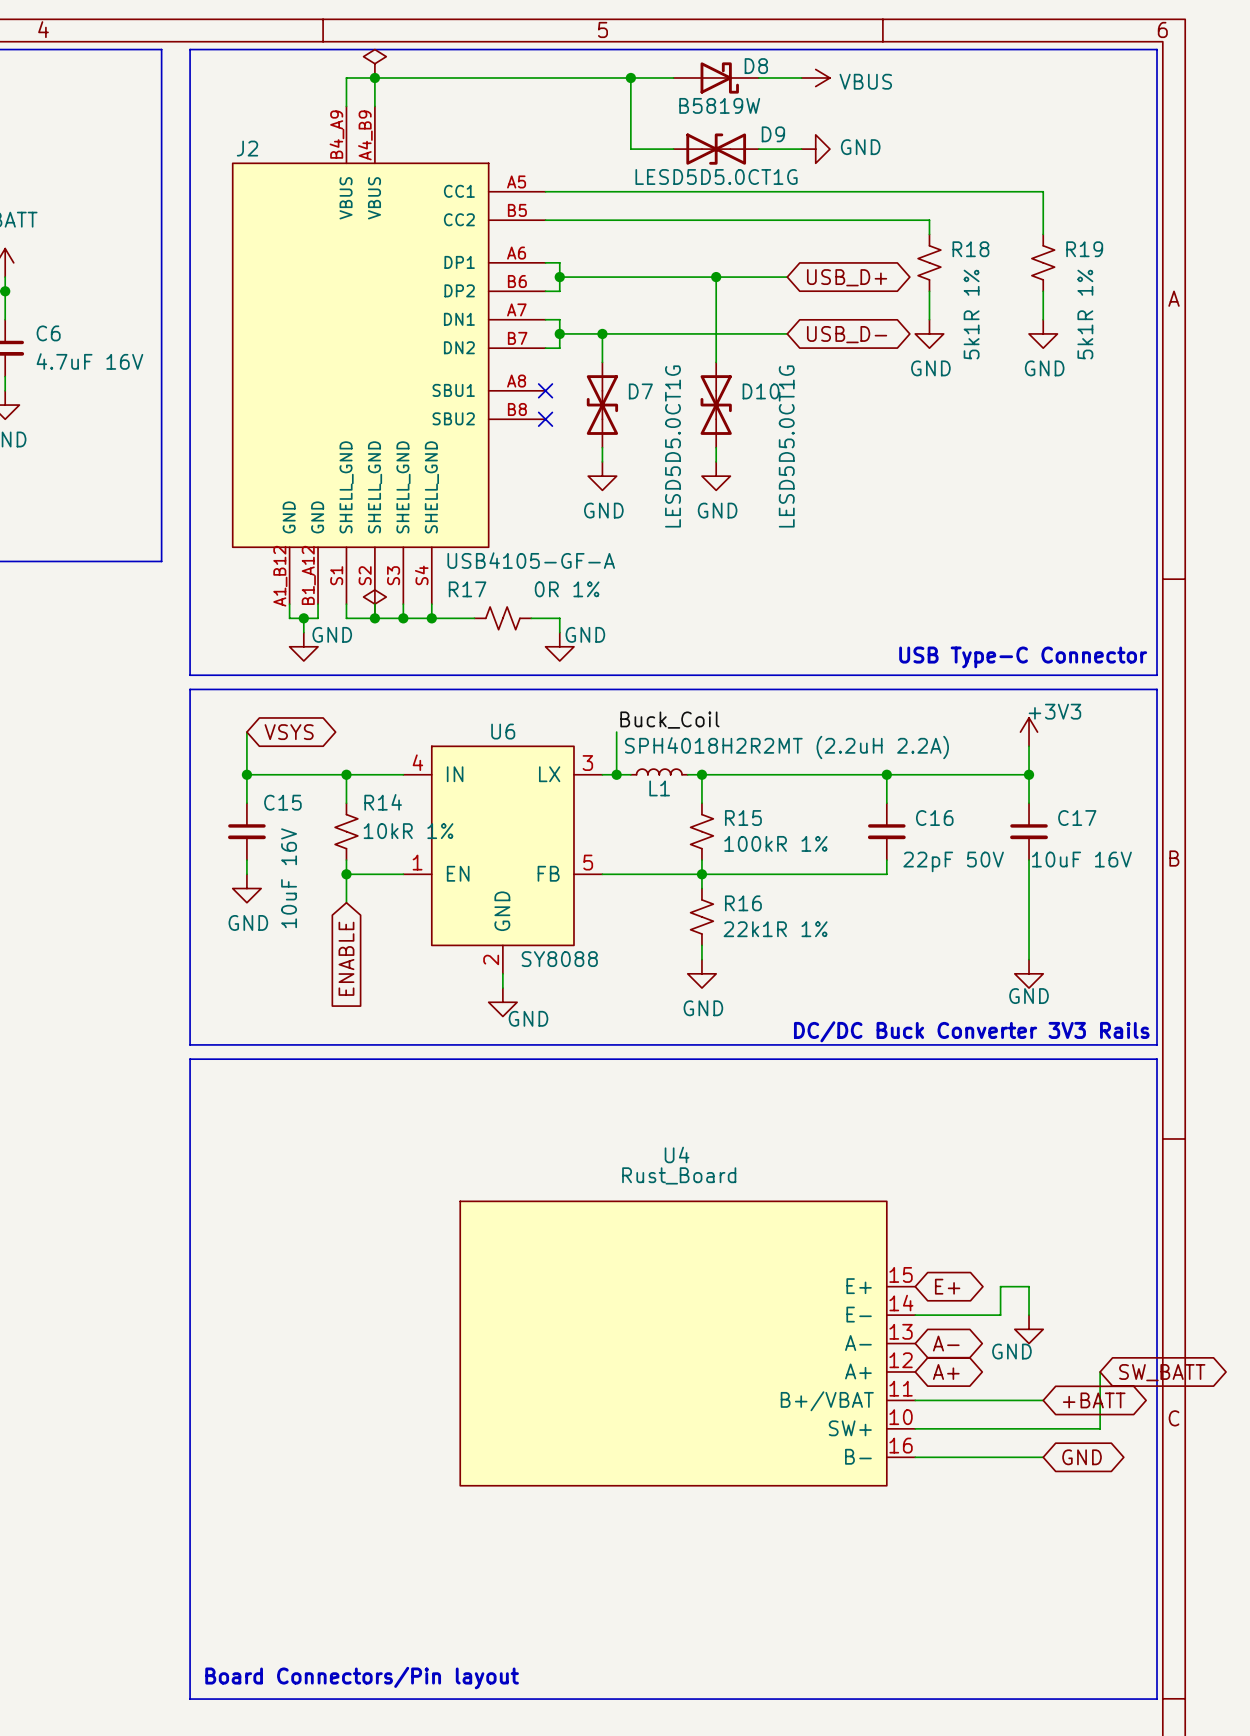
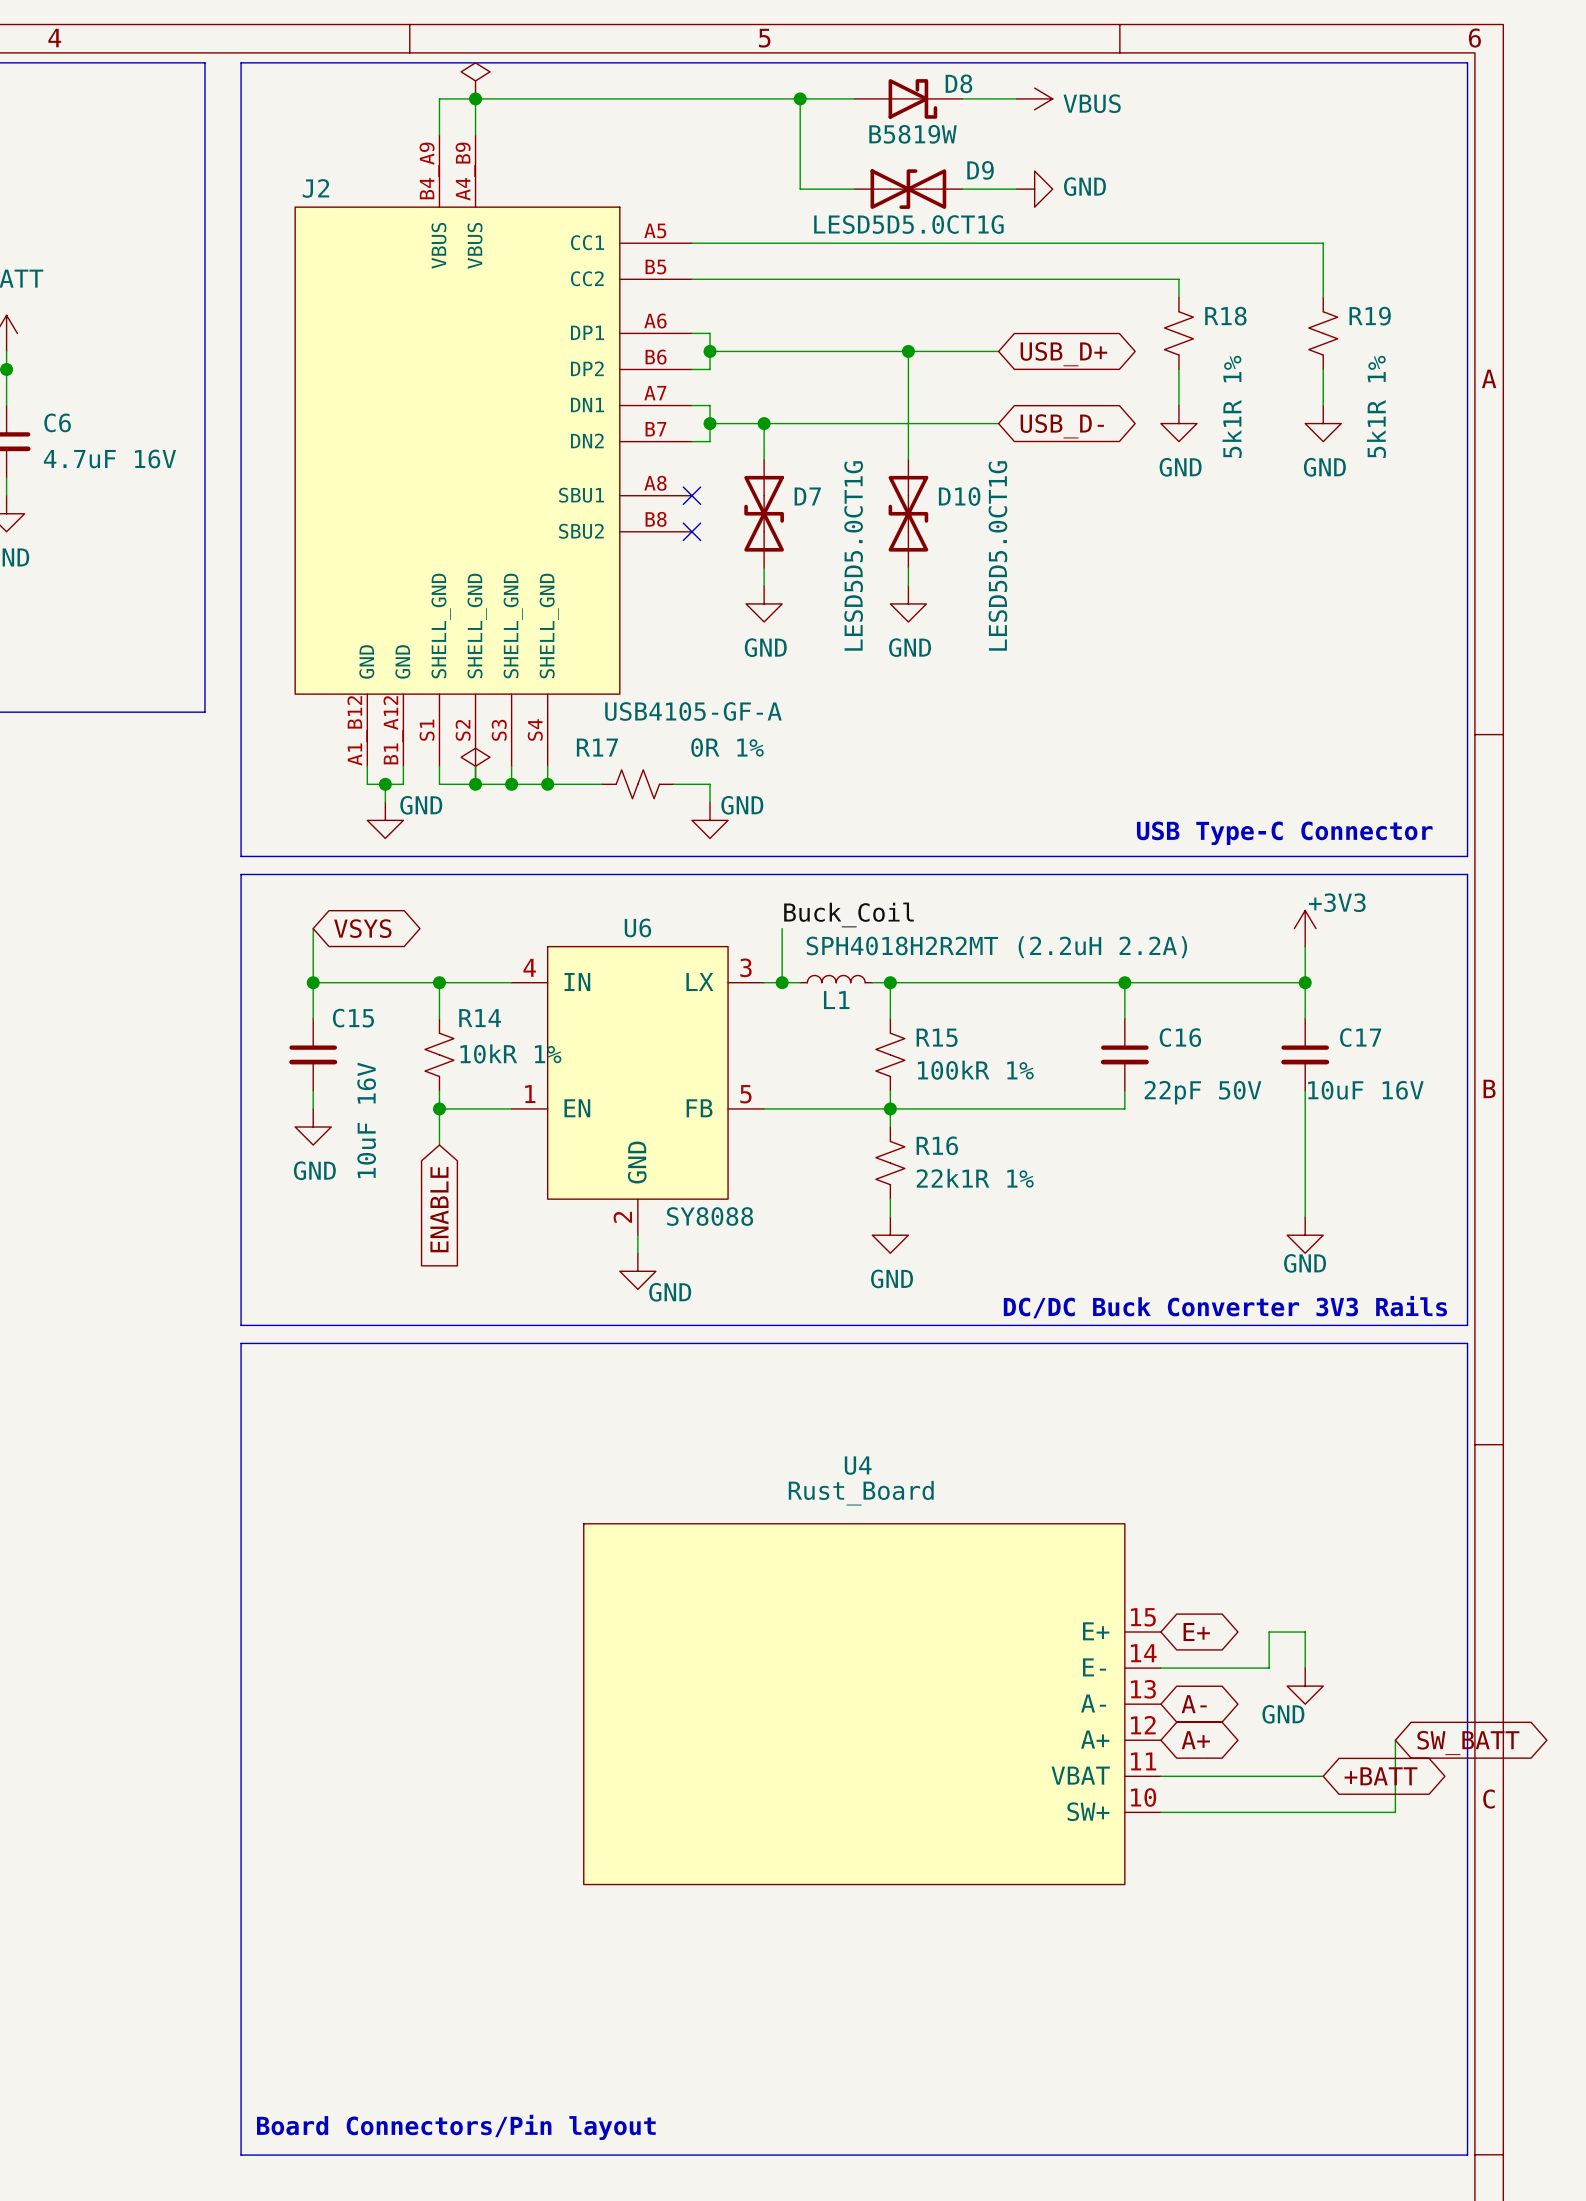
U4 symbol: [460, 1201, 916, 1486] -> [583, 1523, 1161, 1885]
wire: (915, 1457) (1043, 1457) -> none
global label: GND (1082, 1457) -> none

